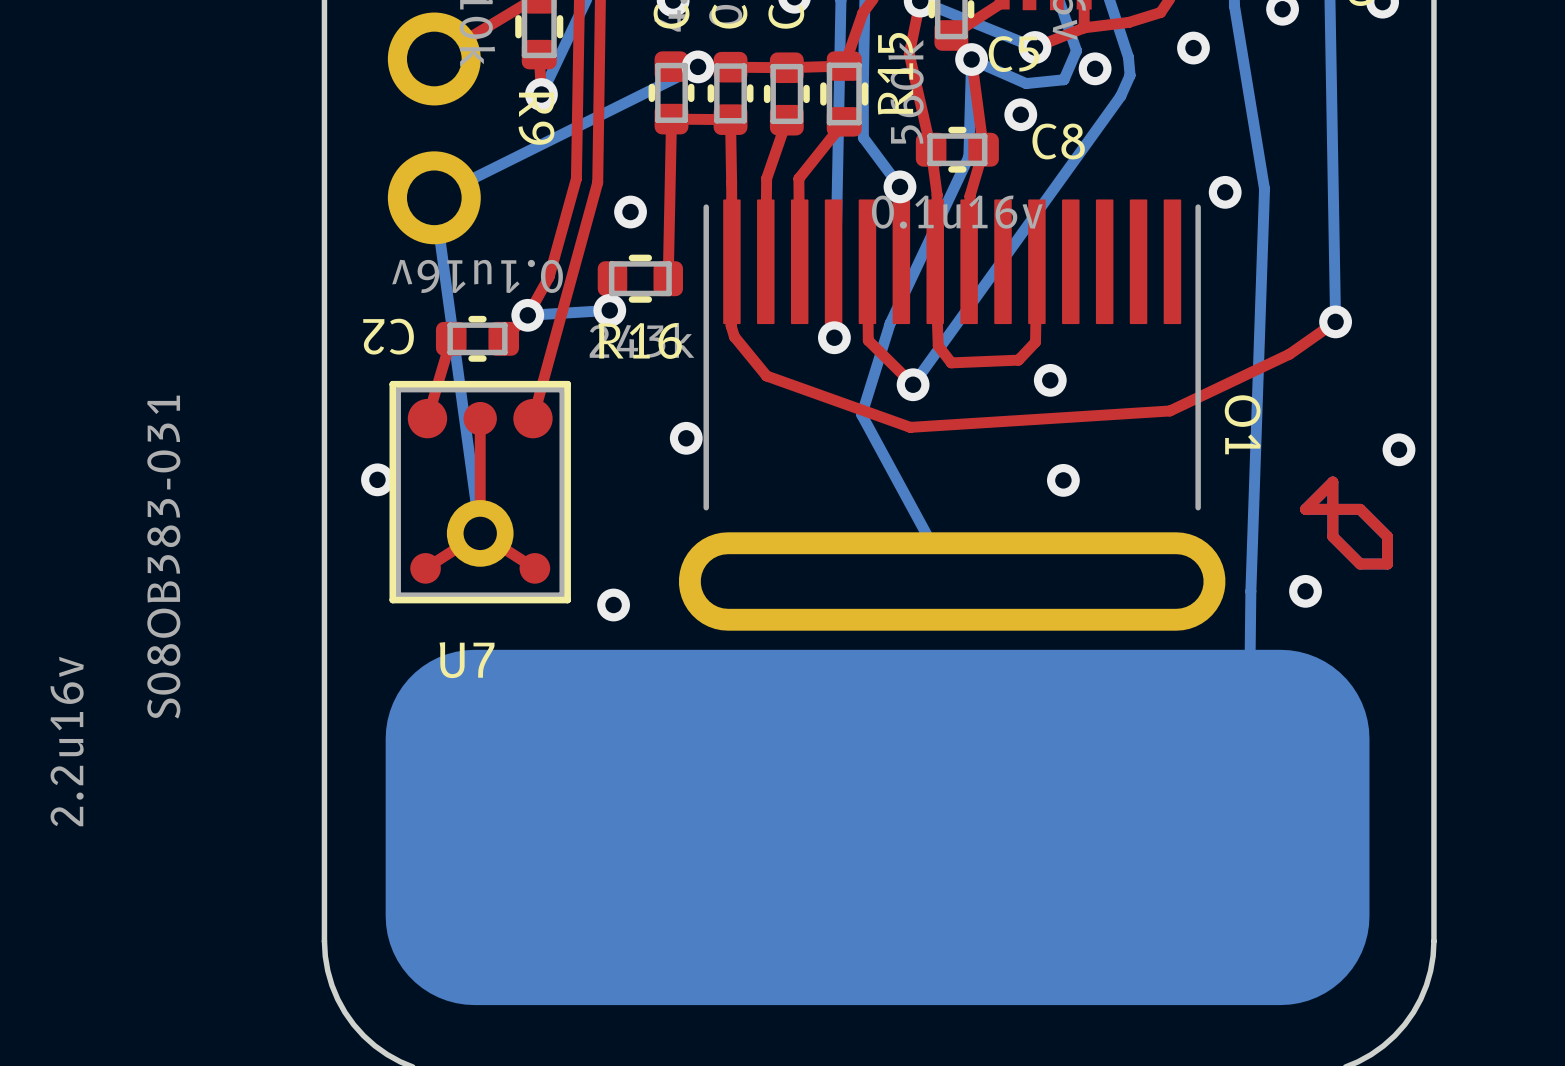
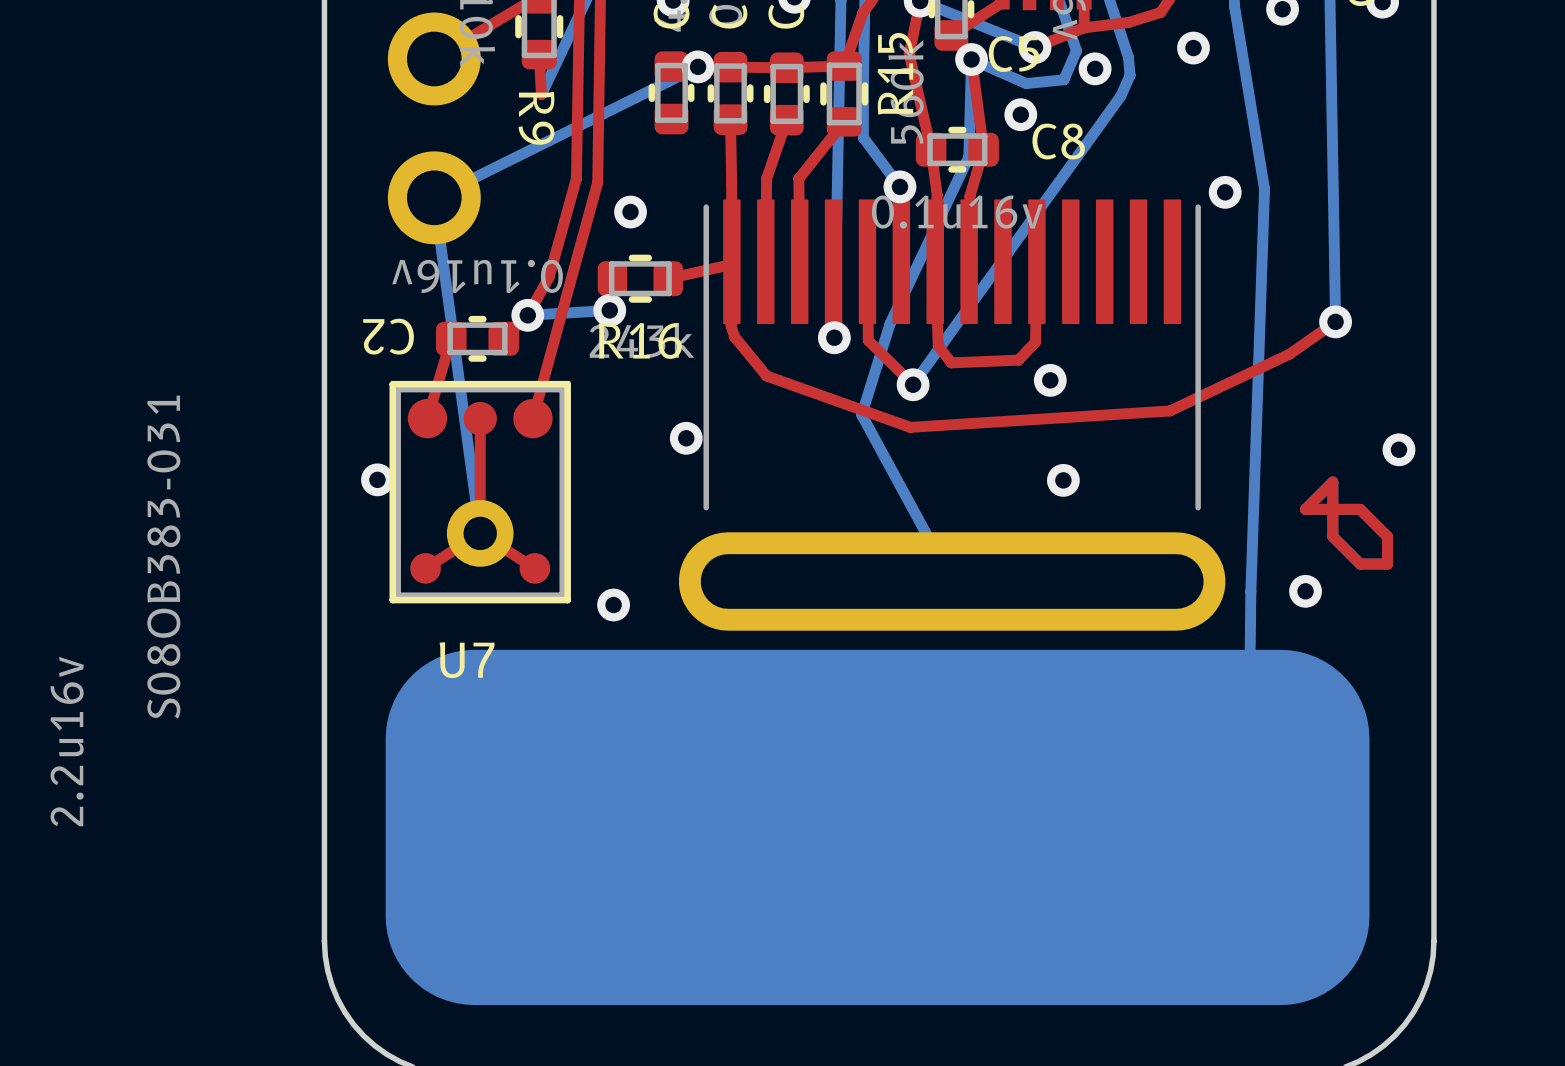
via: (541, 94) -> none
top track: (730, 119) (671, 119) (668, 278) -> (731, 264) (668, 278)
O1 name: O1 (1242, 424) -> none

